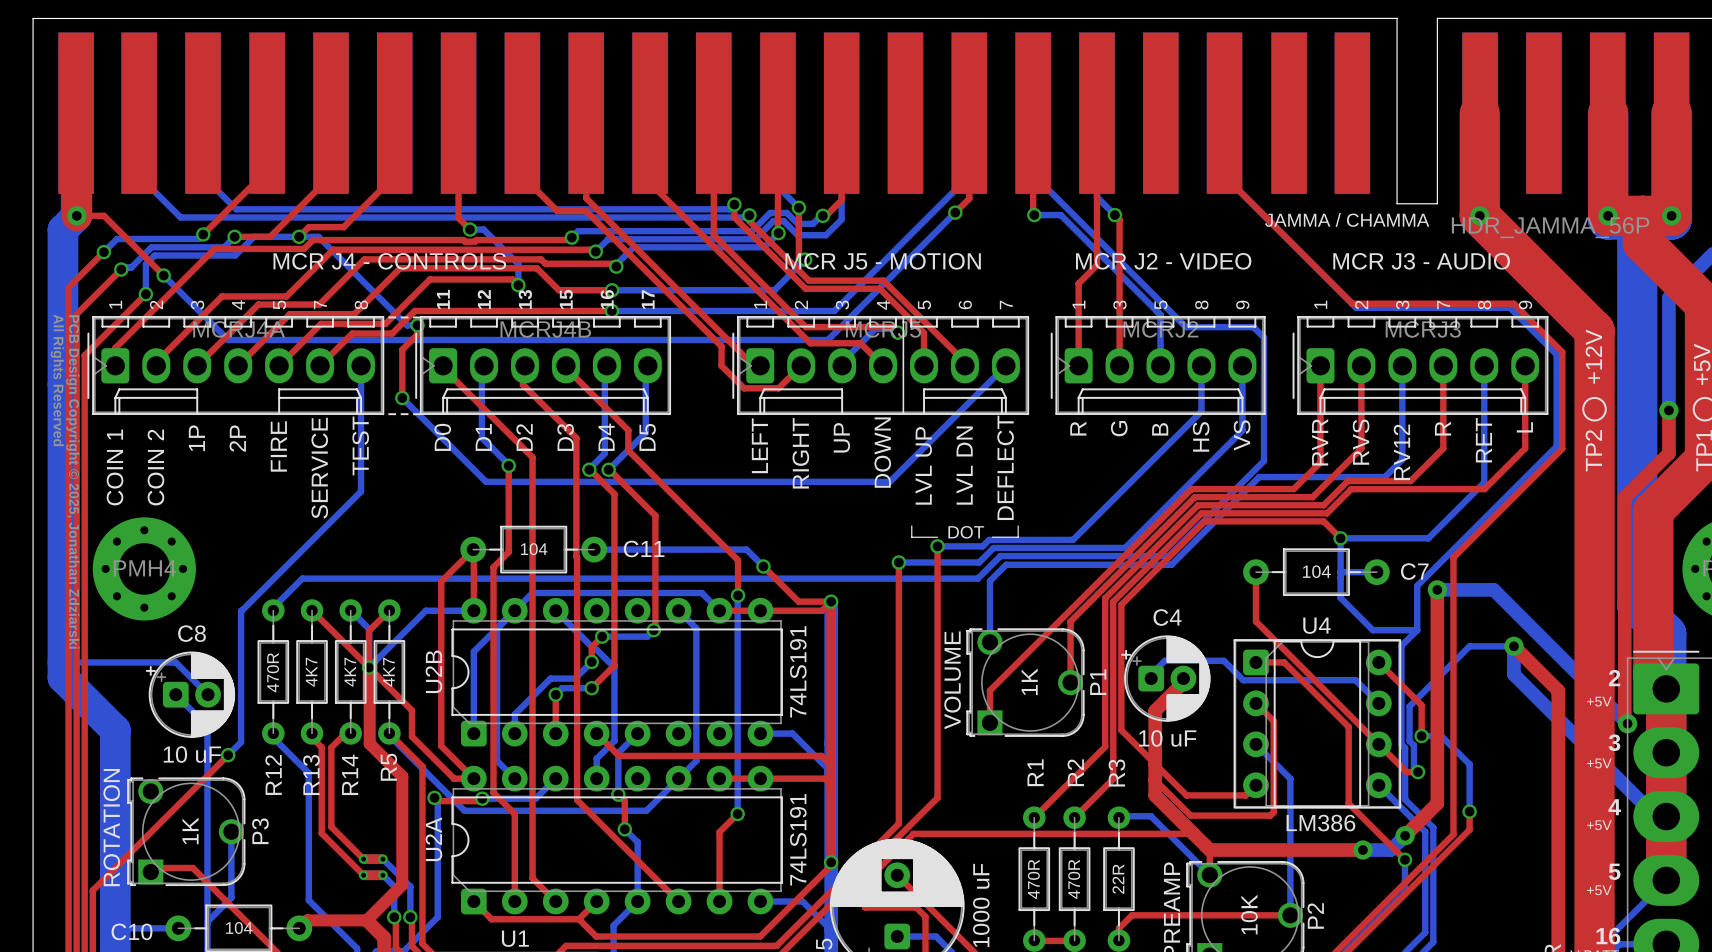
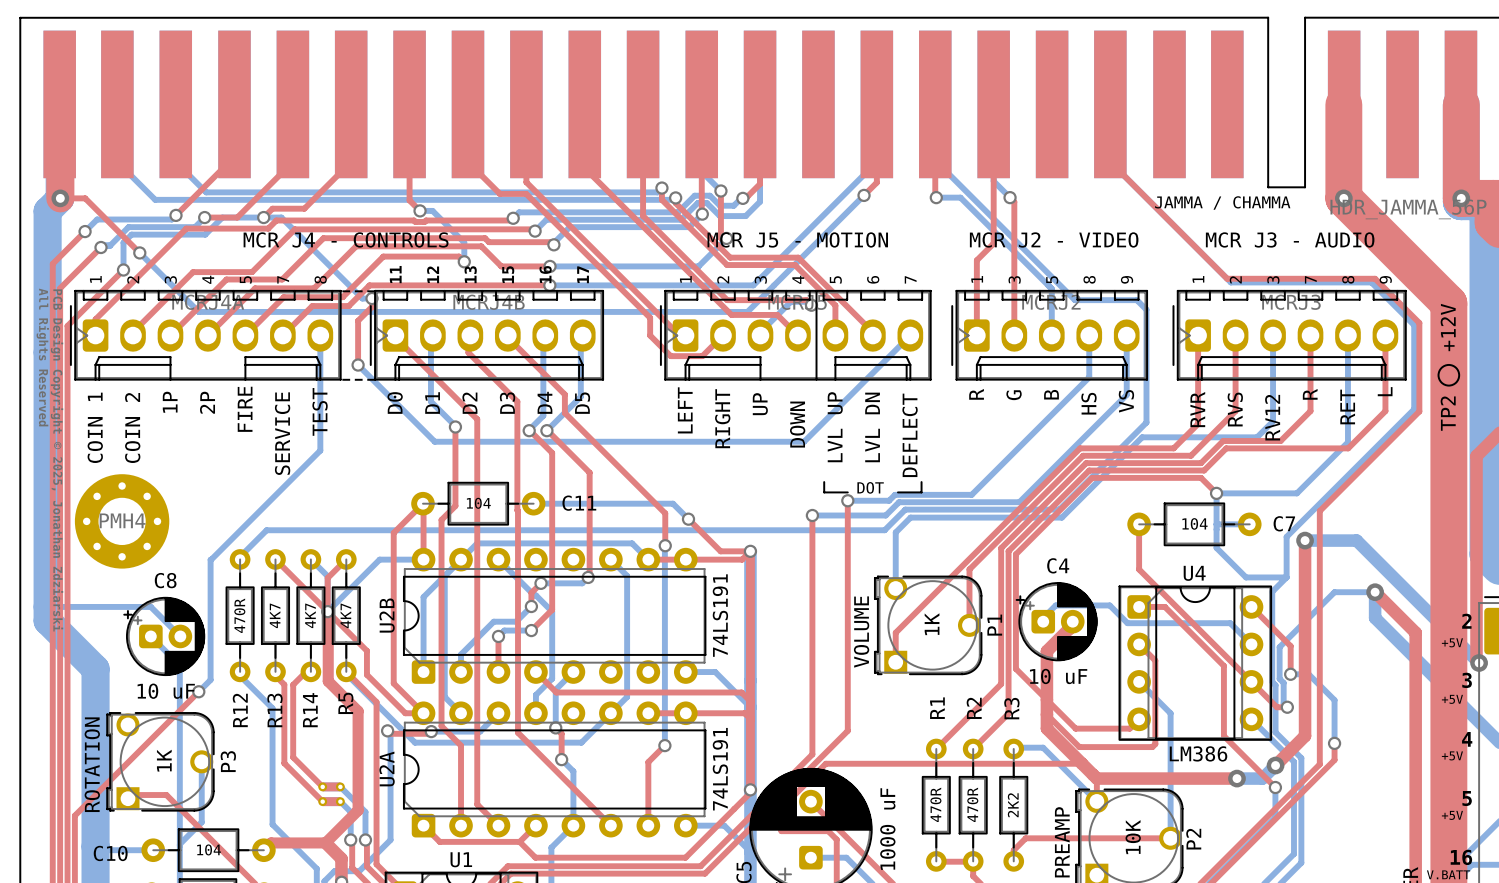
R3 value: 22R (1118, 879) -> 2K2 (1013, 805)

